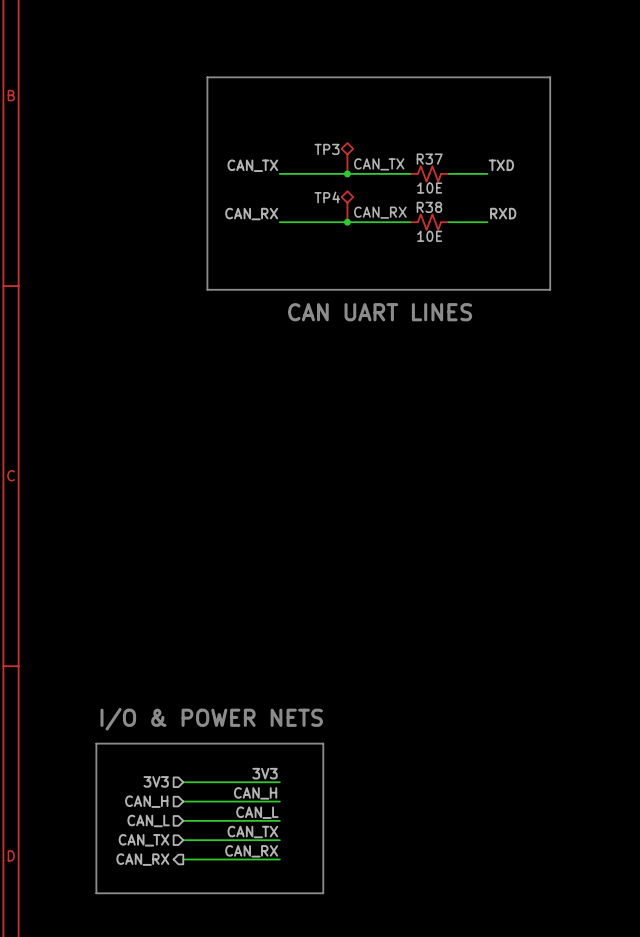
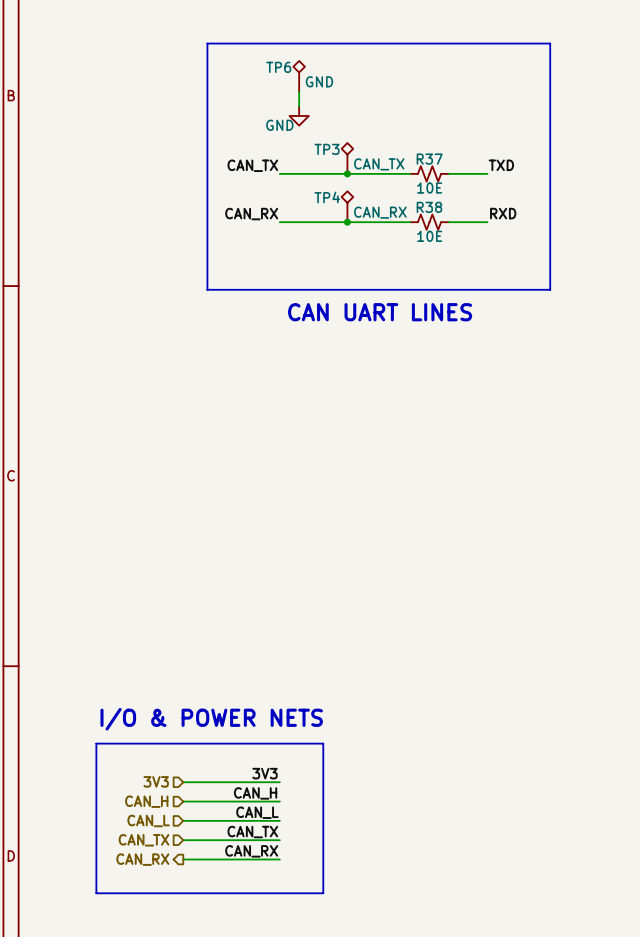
TP6: none -> GND (299, 76)
bus: (207, 77) (550, 77) -> (207, 77) (207, 43) (550, 43) (550, 77)
wire: none -> (299, 91) (299, 106)
power symbol: none -> GND (299, 115)

